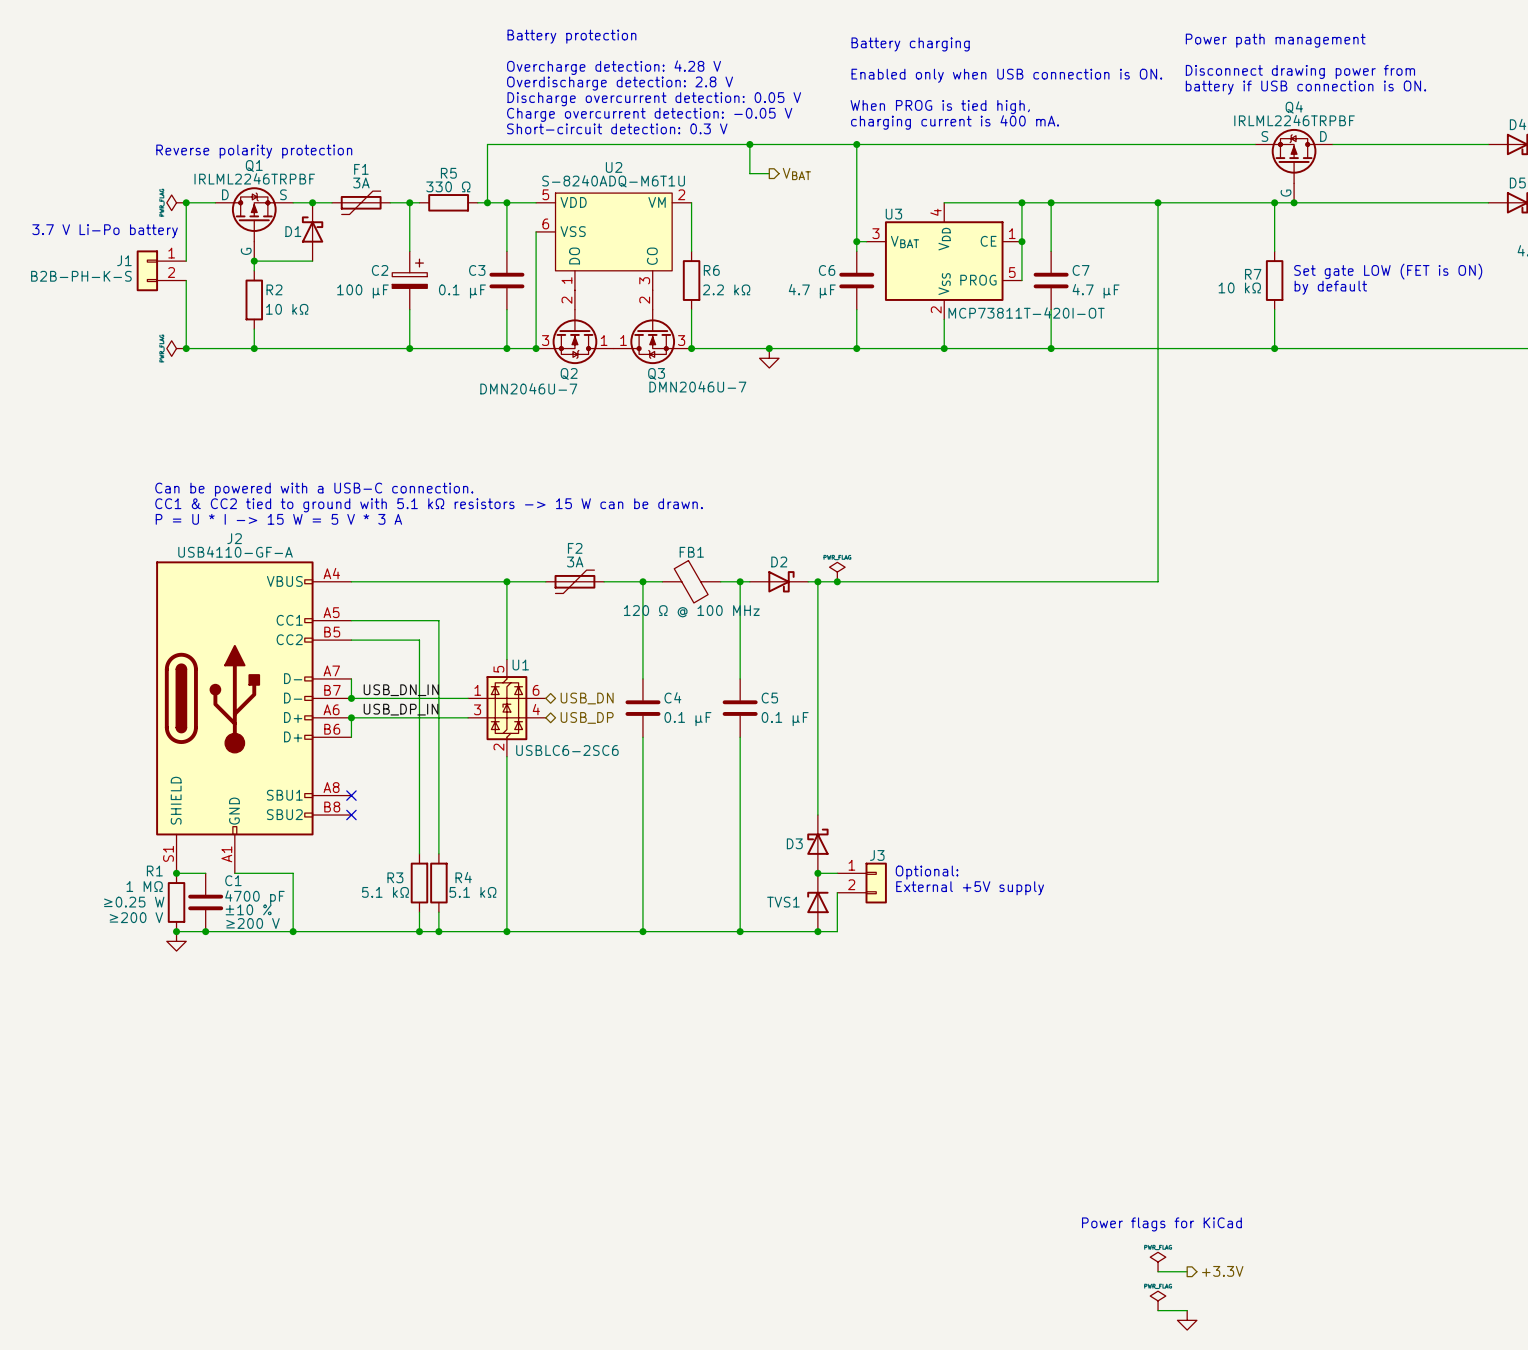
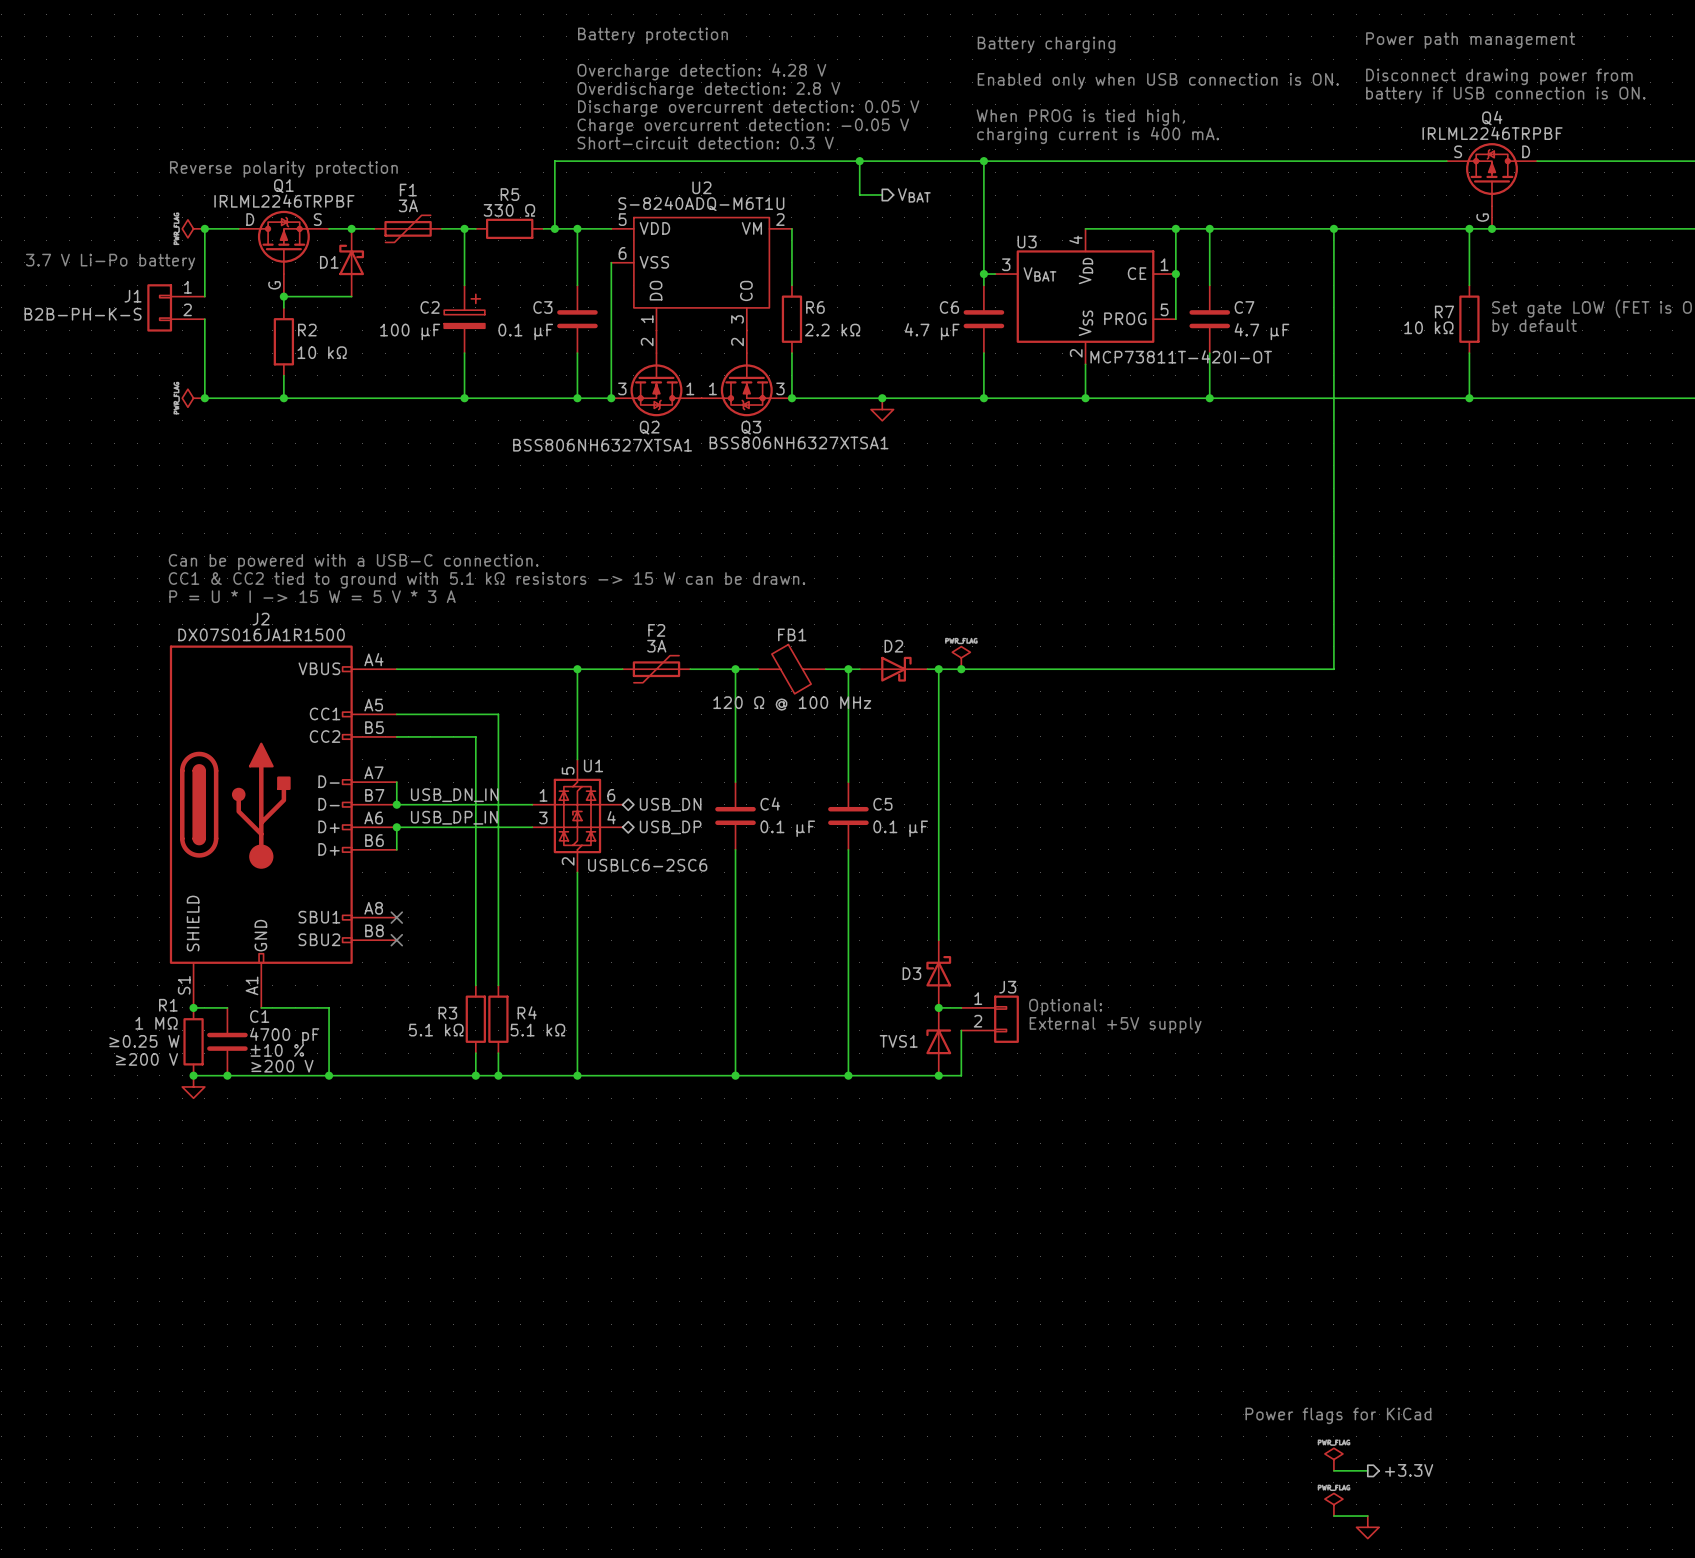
Q3 value: DMN2046U-7 (697, 386) -> BSS806NH6327XTSA1 (799, 442)
Q2 value: DMN2046U-7 (528, 388) -> BSS806NH6327XTSA1 (602, 445)
J2 value: USB4110-GF-A (235, 552) -> DX07S016JA1R1500 (261, 634)

